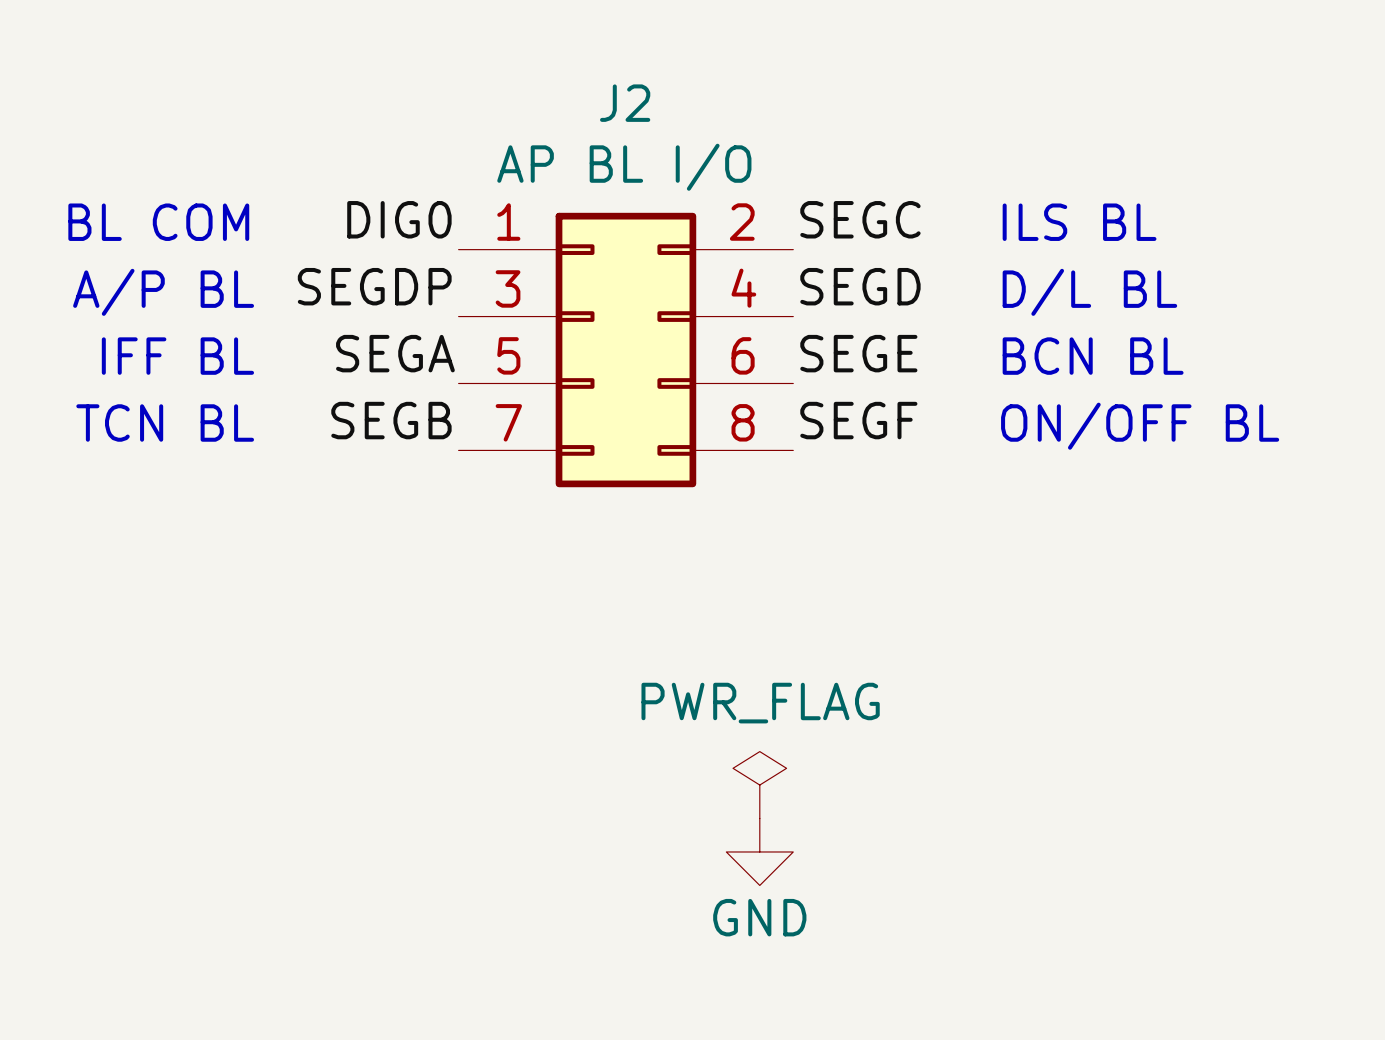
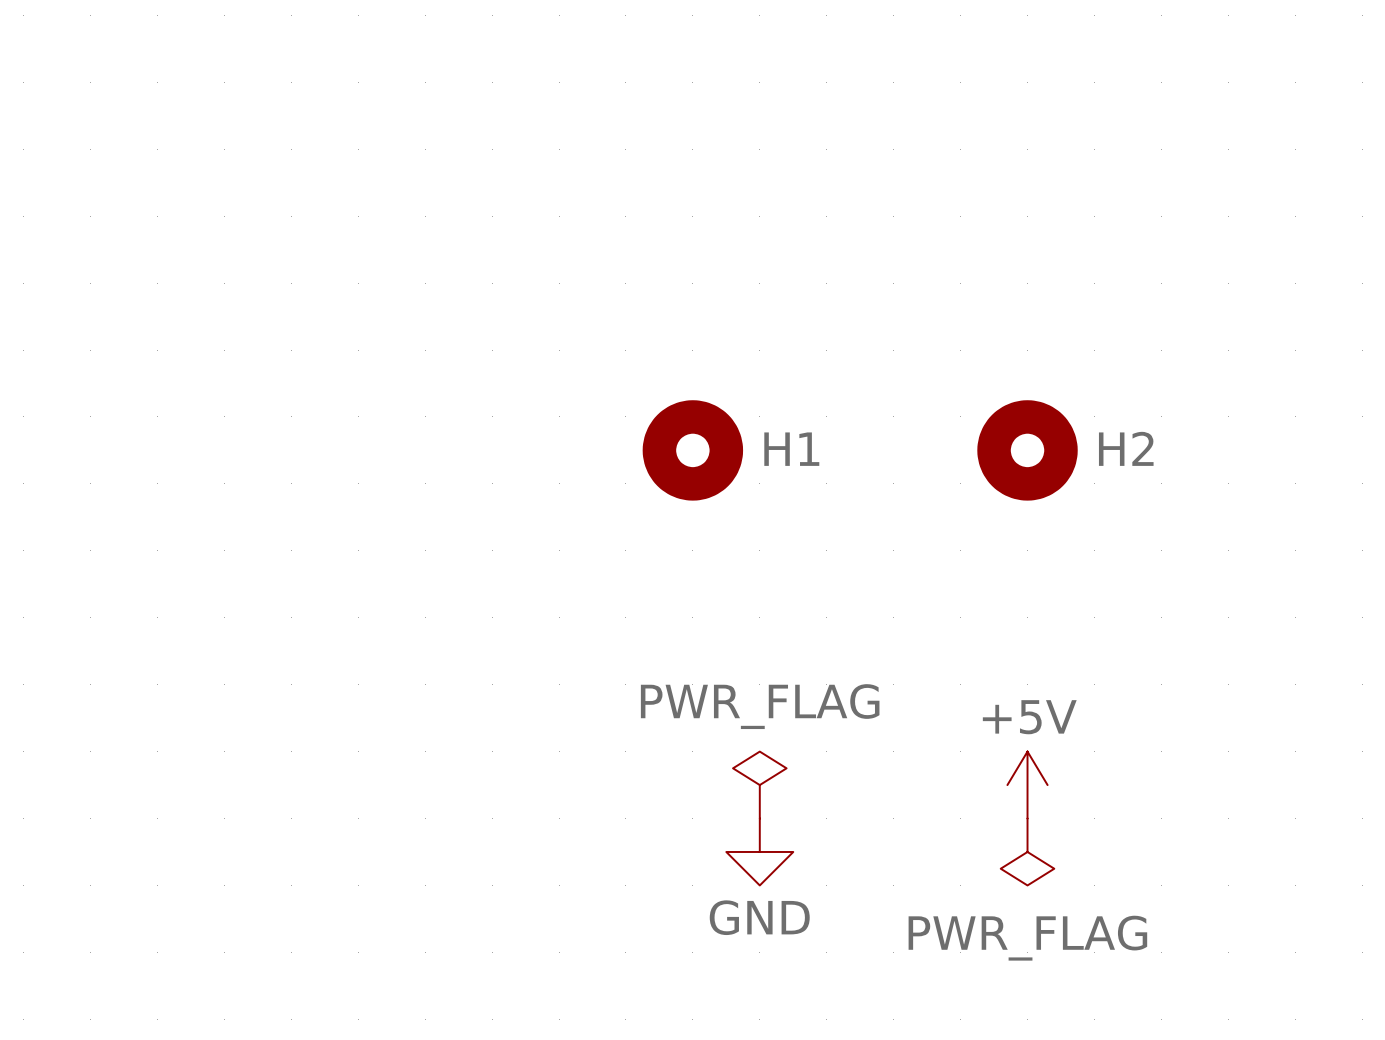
label: DIG0 (399, 219) -> none
label: SEGC (860, 219) -> none
text: BL COM (158, 222) -> none
text: ILS BL (1079, 222) -> none
label: SEGDP (374, 286) -> none
label: SEGD (860, 286) -> none
text: A/P BL (163, 292) -> none
text: D/L BL (1089, 292) -> none
J2: AP BL I/O (625, 350) -> none
label: SEGA (395, 353) -> none
label: SEGE (858, 353) -> none
text: IFF BL (177, 356) -> none
text: BCN BL (1093, 356) -> none
label: SEGB (391, 420) -> none
label: SEGF (858, 420) -> none
text: TCN BL (165, 423) -> none
text: ON/OFF BL (1140, 426) -> none
H1: none -> (692, 450)
H2: none -> (1027, 450)
power symbol: none -> +5V (1027, 785)
power symbol: none -> PWR_FLAG (1027, 851)

